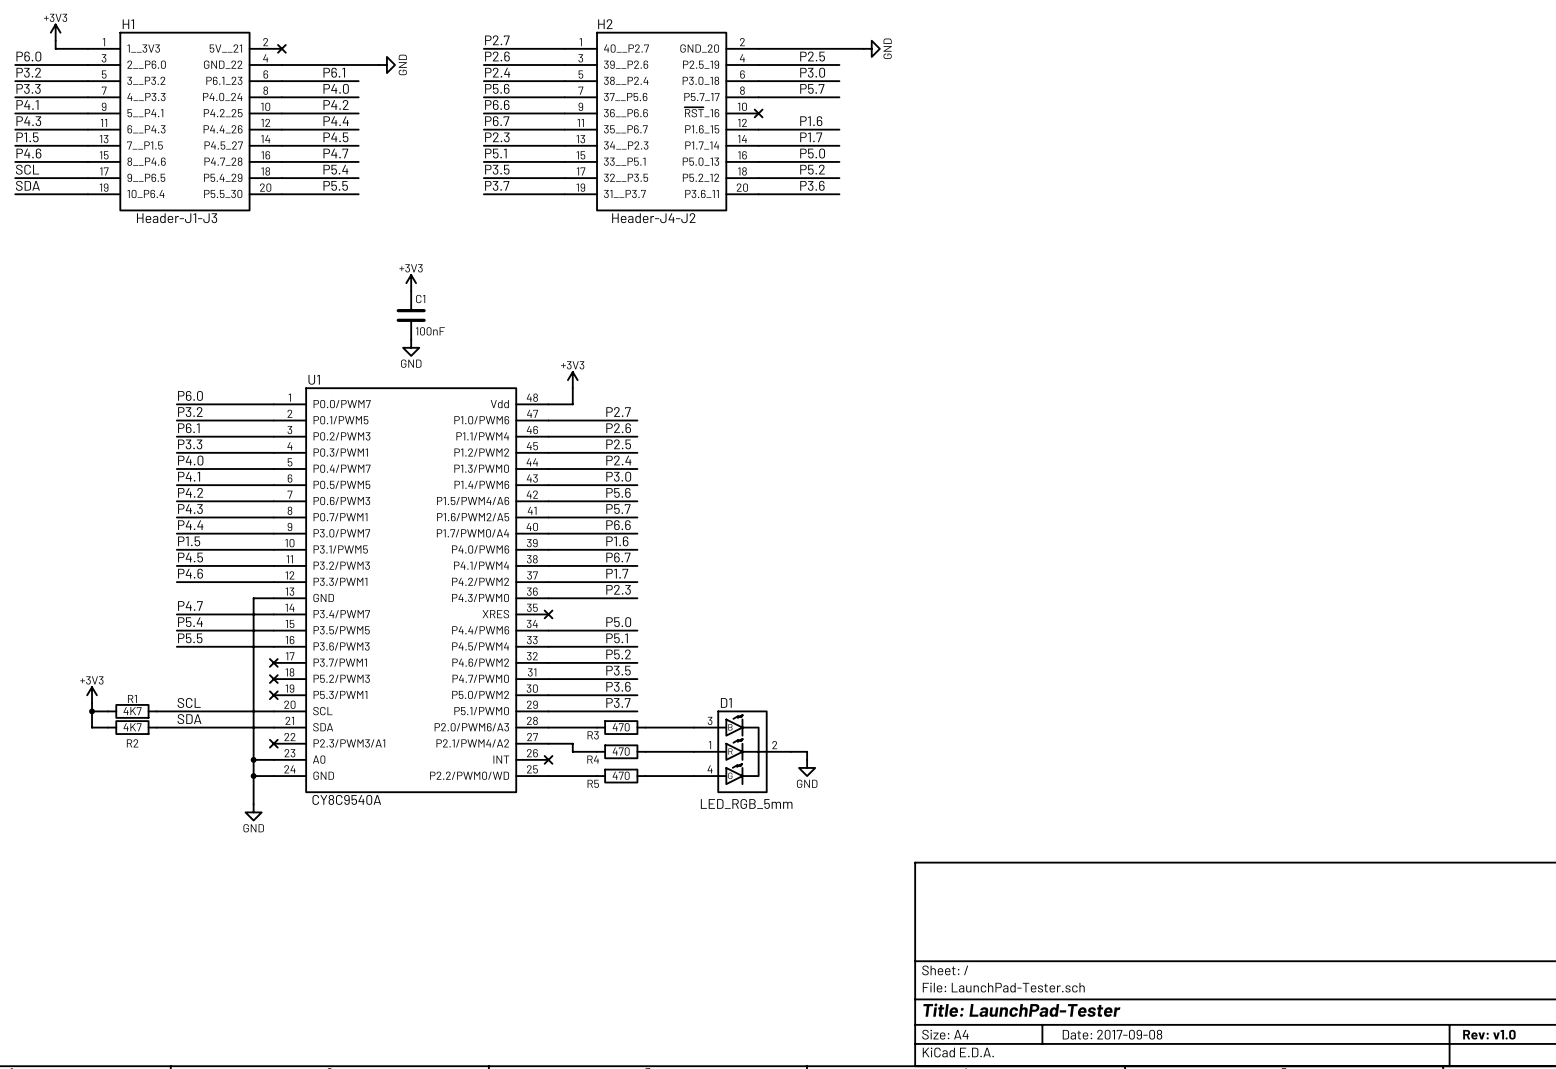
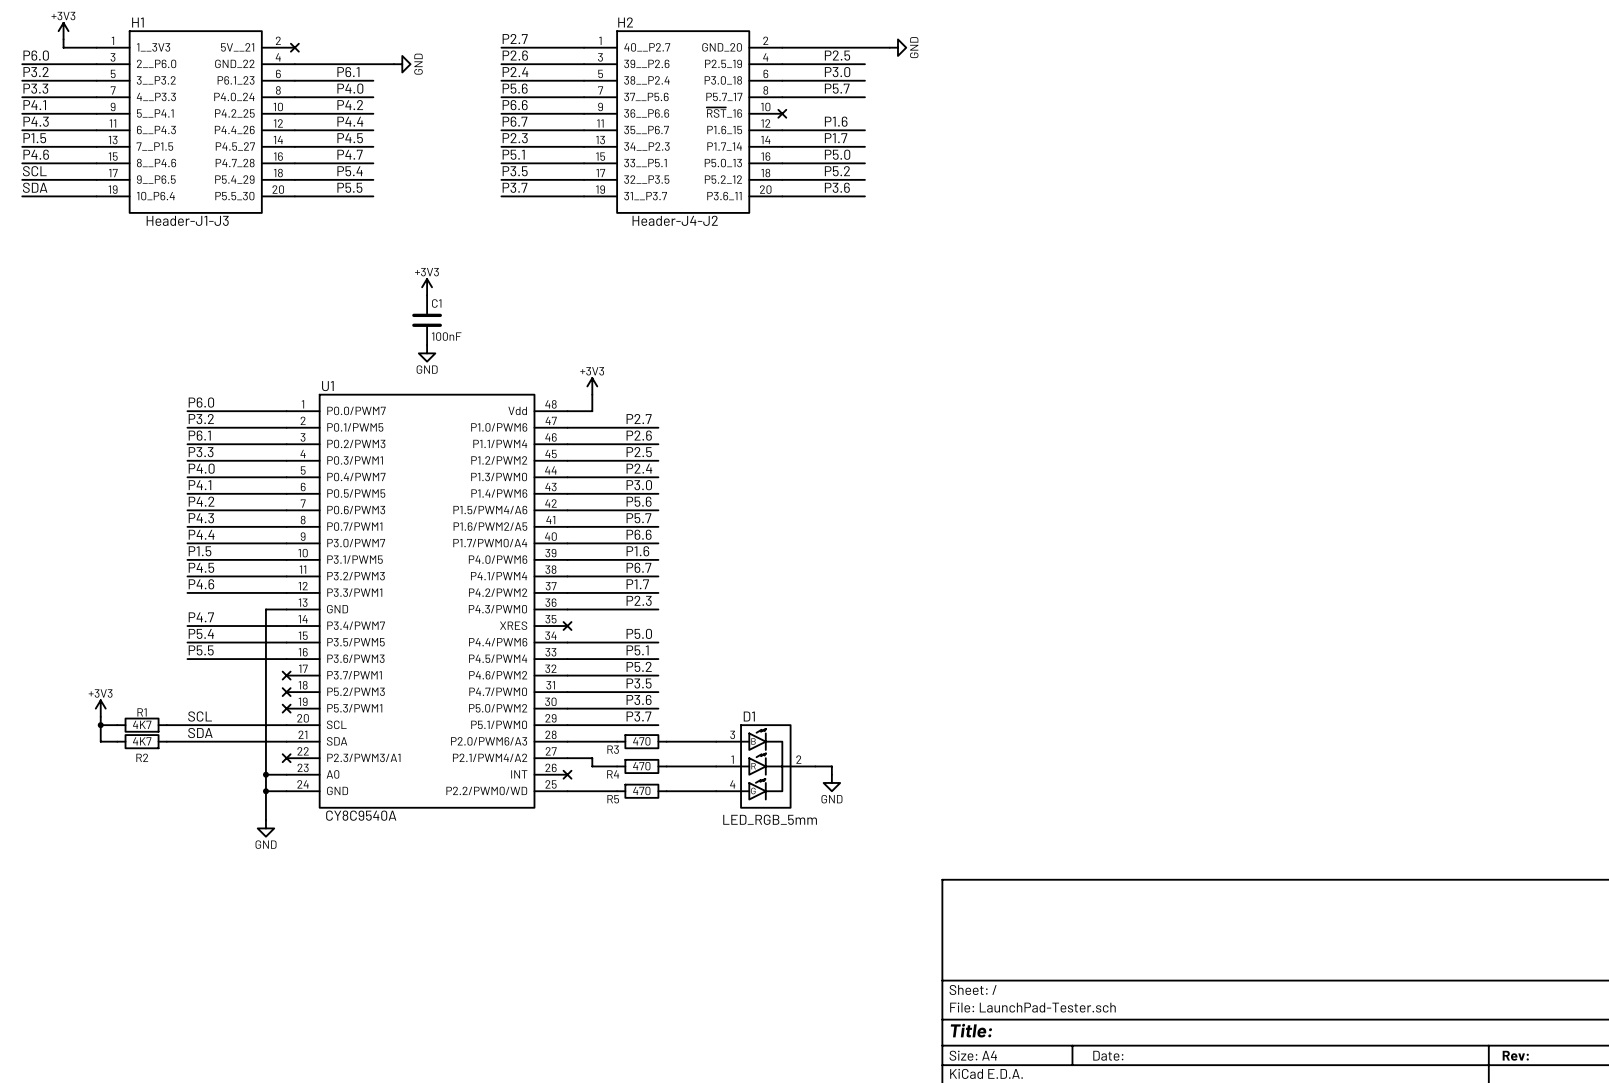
title block: Title: LaunchPad-Tester (1021, 1010) -> Title: (971, 1030)
title block: Date: 2017-09-08 (1112, 1034) -> Date: (1108, 1055)
title block: Rev: v1.0 (1489, 1034) -> Rev: (1515, 1055)

